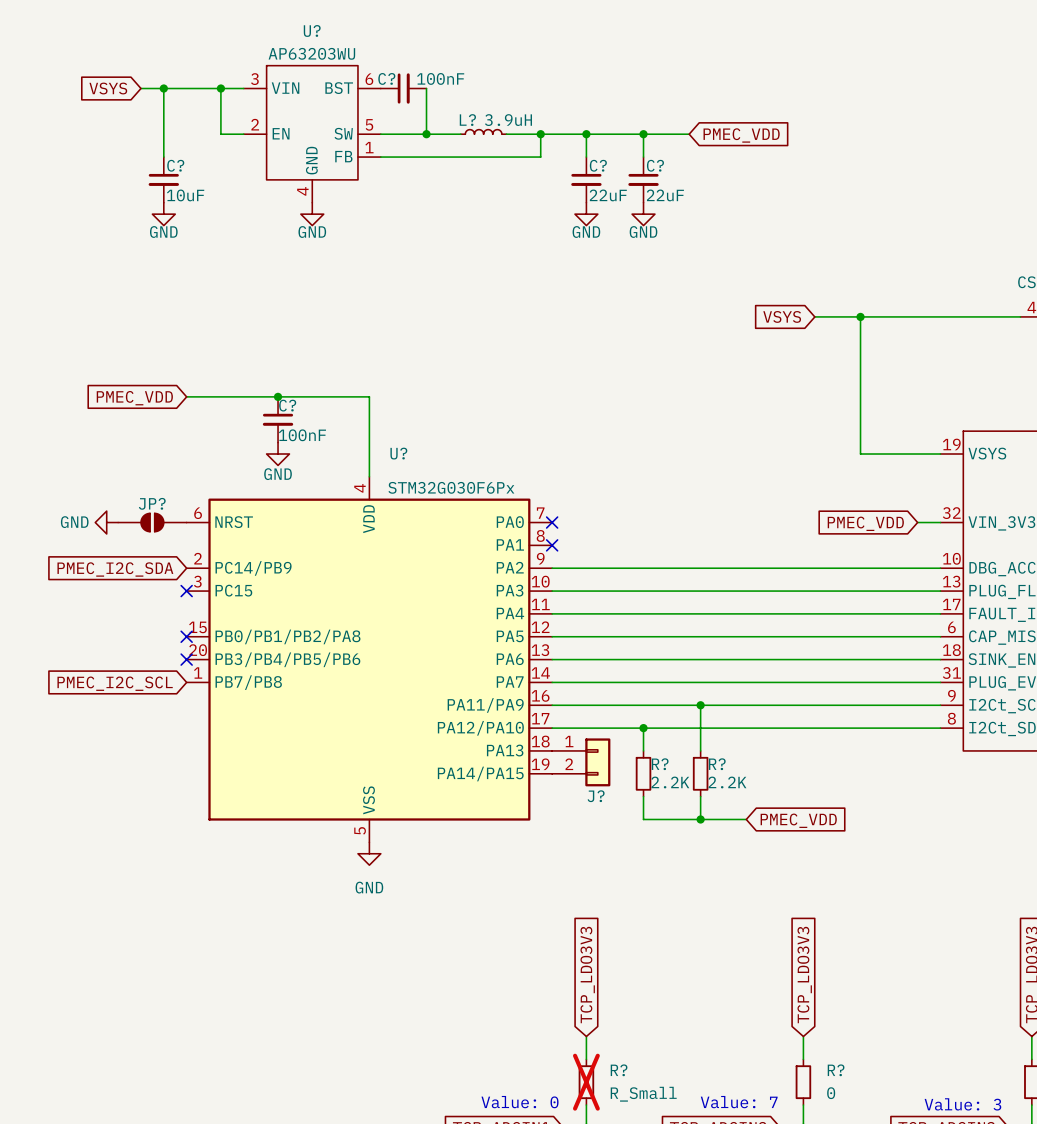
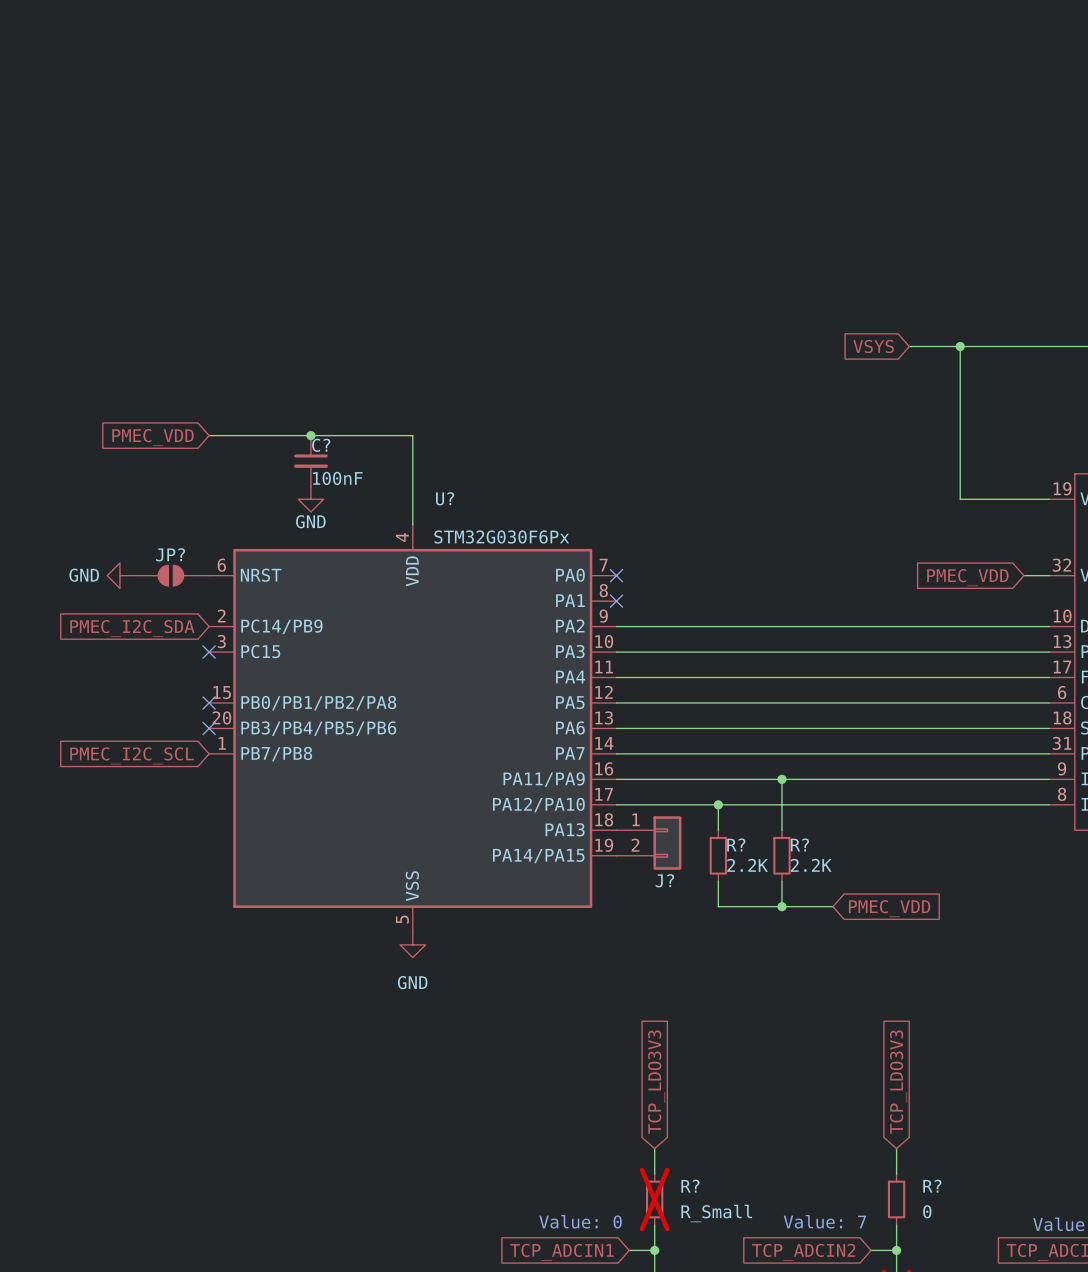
global label: VSYS (108, 88) -> none
wire: (140, 88) (243, 88) -> none
wire: (163, 88) (163, 157) -> none
junction: (163, 88) -> none
wire: (220, 88) (220, 134) (243, 134) -> none
junction: (220, 88) -> none
C?: 100nF (403, 88) -> none
wire: (426, 88) (426, 134) -> none
L?: 3.9uH (483, 131) -> none
U?: AP63203WU (312, 134) -> none
wire: (380, 134) (460, 134) -> none
junction: (426, 134) -> none
wire: (506, 134) (689, 134) -> none
wire: (540, 134) (540, 157) (380, 157) -> none
junction: (540, 134) -> none
wire: (586, 134) (586, 157) -> none
junction: (586, 134) -> none
wire: (643, 134) (643, 157) -> none
junction: (643, 134) -> none
global label: PMEC_VDD (741, 135) -> none
C?: 10uF (163, 179) -> none
C?: 22uF (586, 179) -> none
C?: 22uF (643, 179) -> none
power symbol: GND (163, 214) -> none
power symbol: GND (312, 214) -> none
power symbol: GND (586, 214) -> none
power symbol: GND (643, 214) -> none

